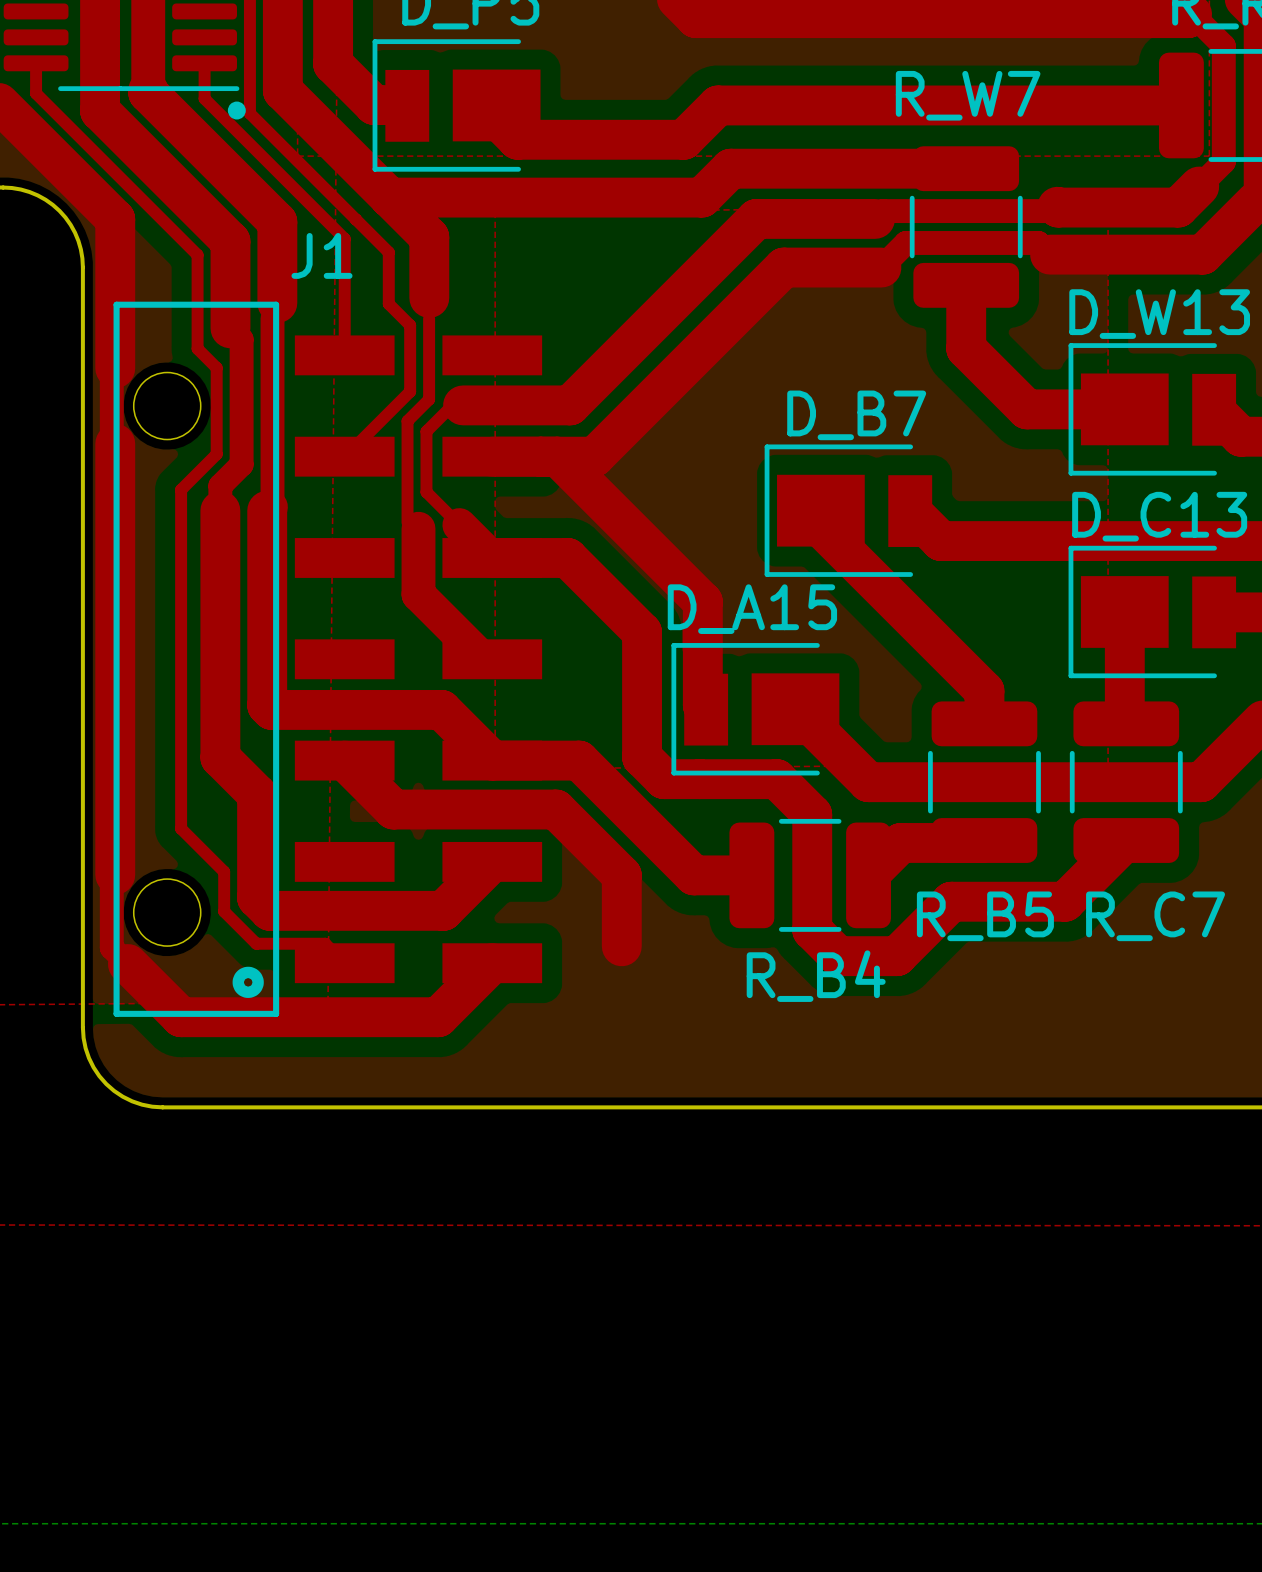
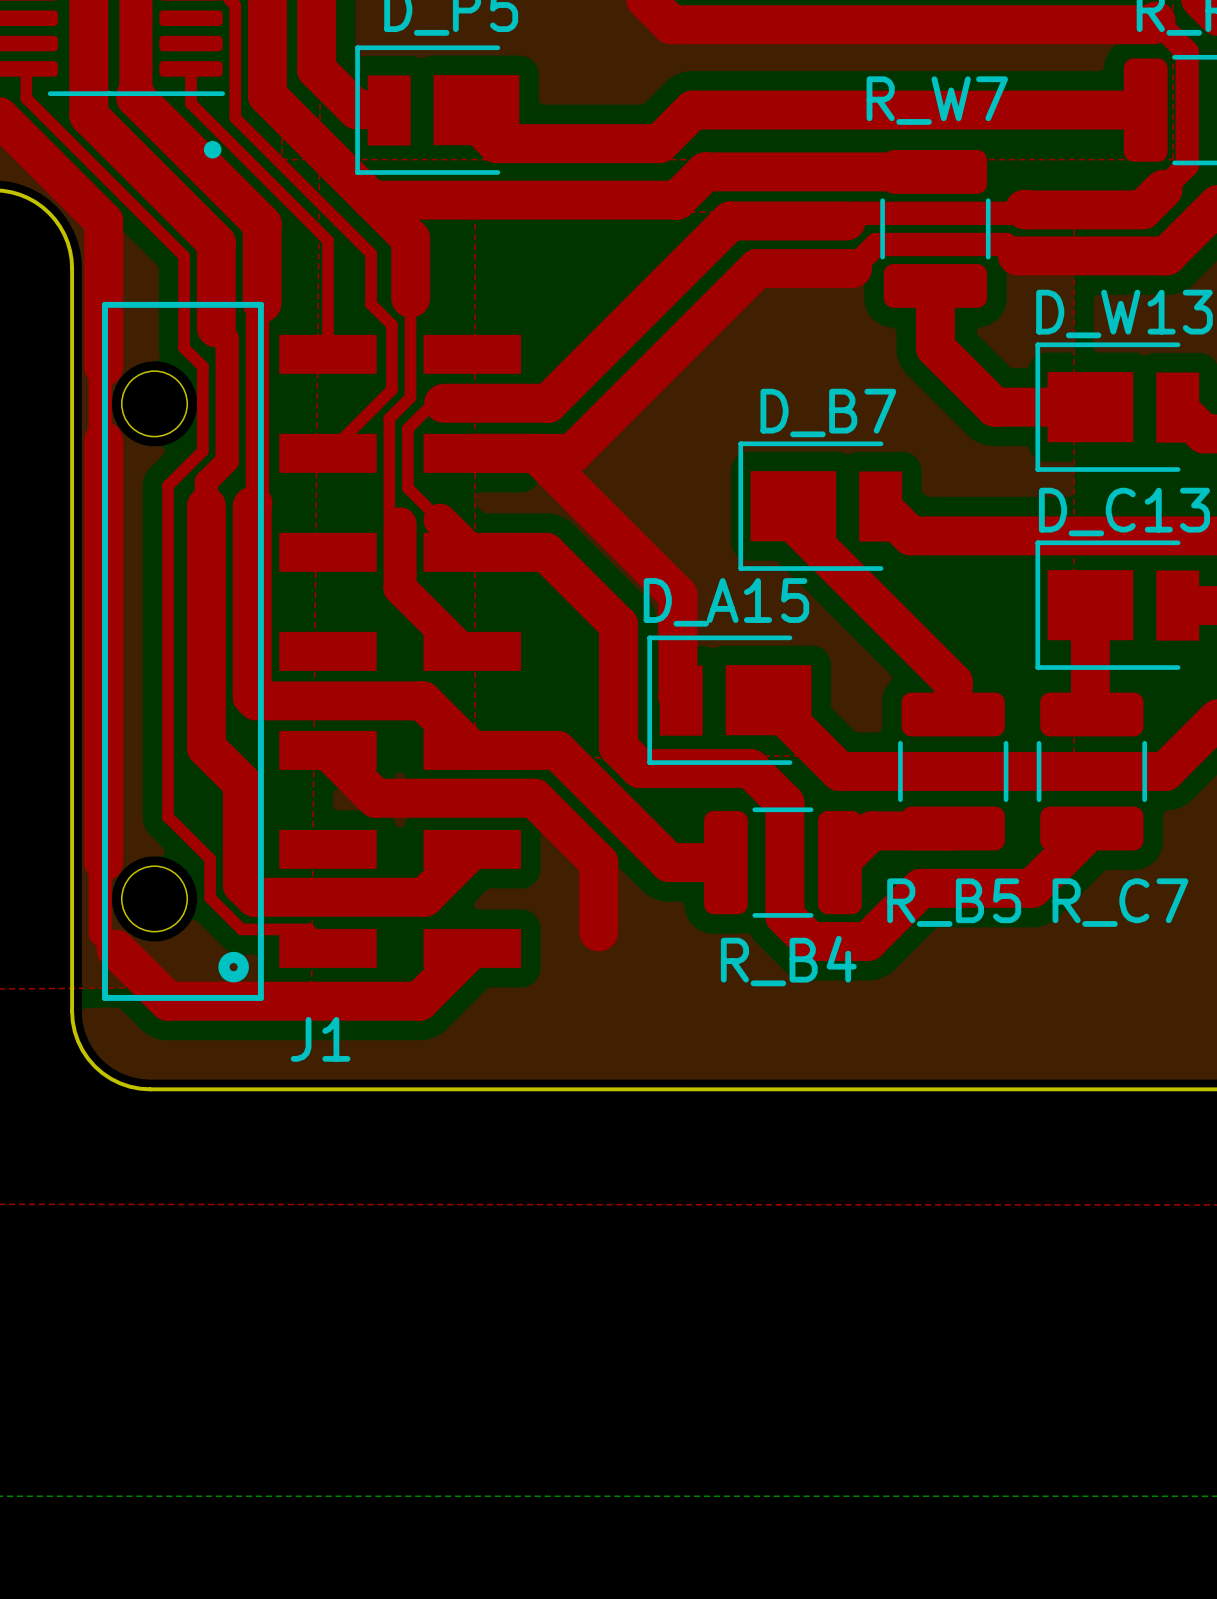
drawing position: (236, 110) -> (212, 149)
J1 name position: J1 (321, 255) -> J1 (320, 1039)

